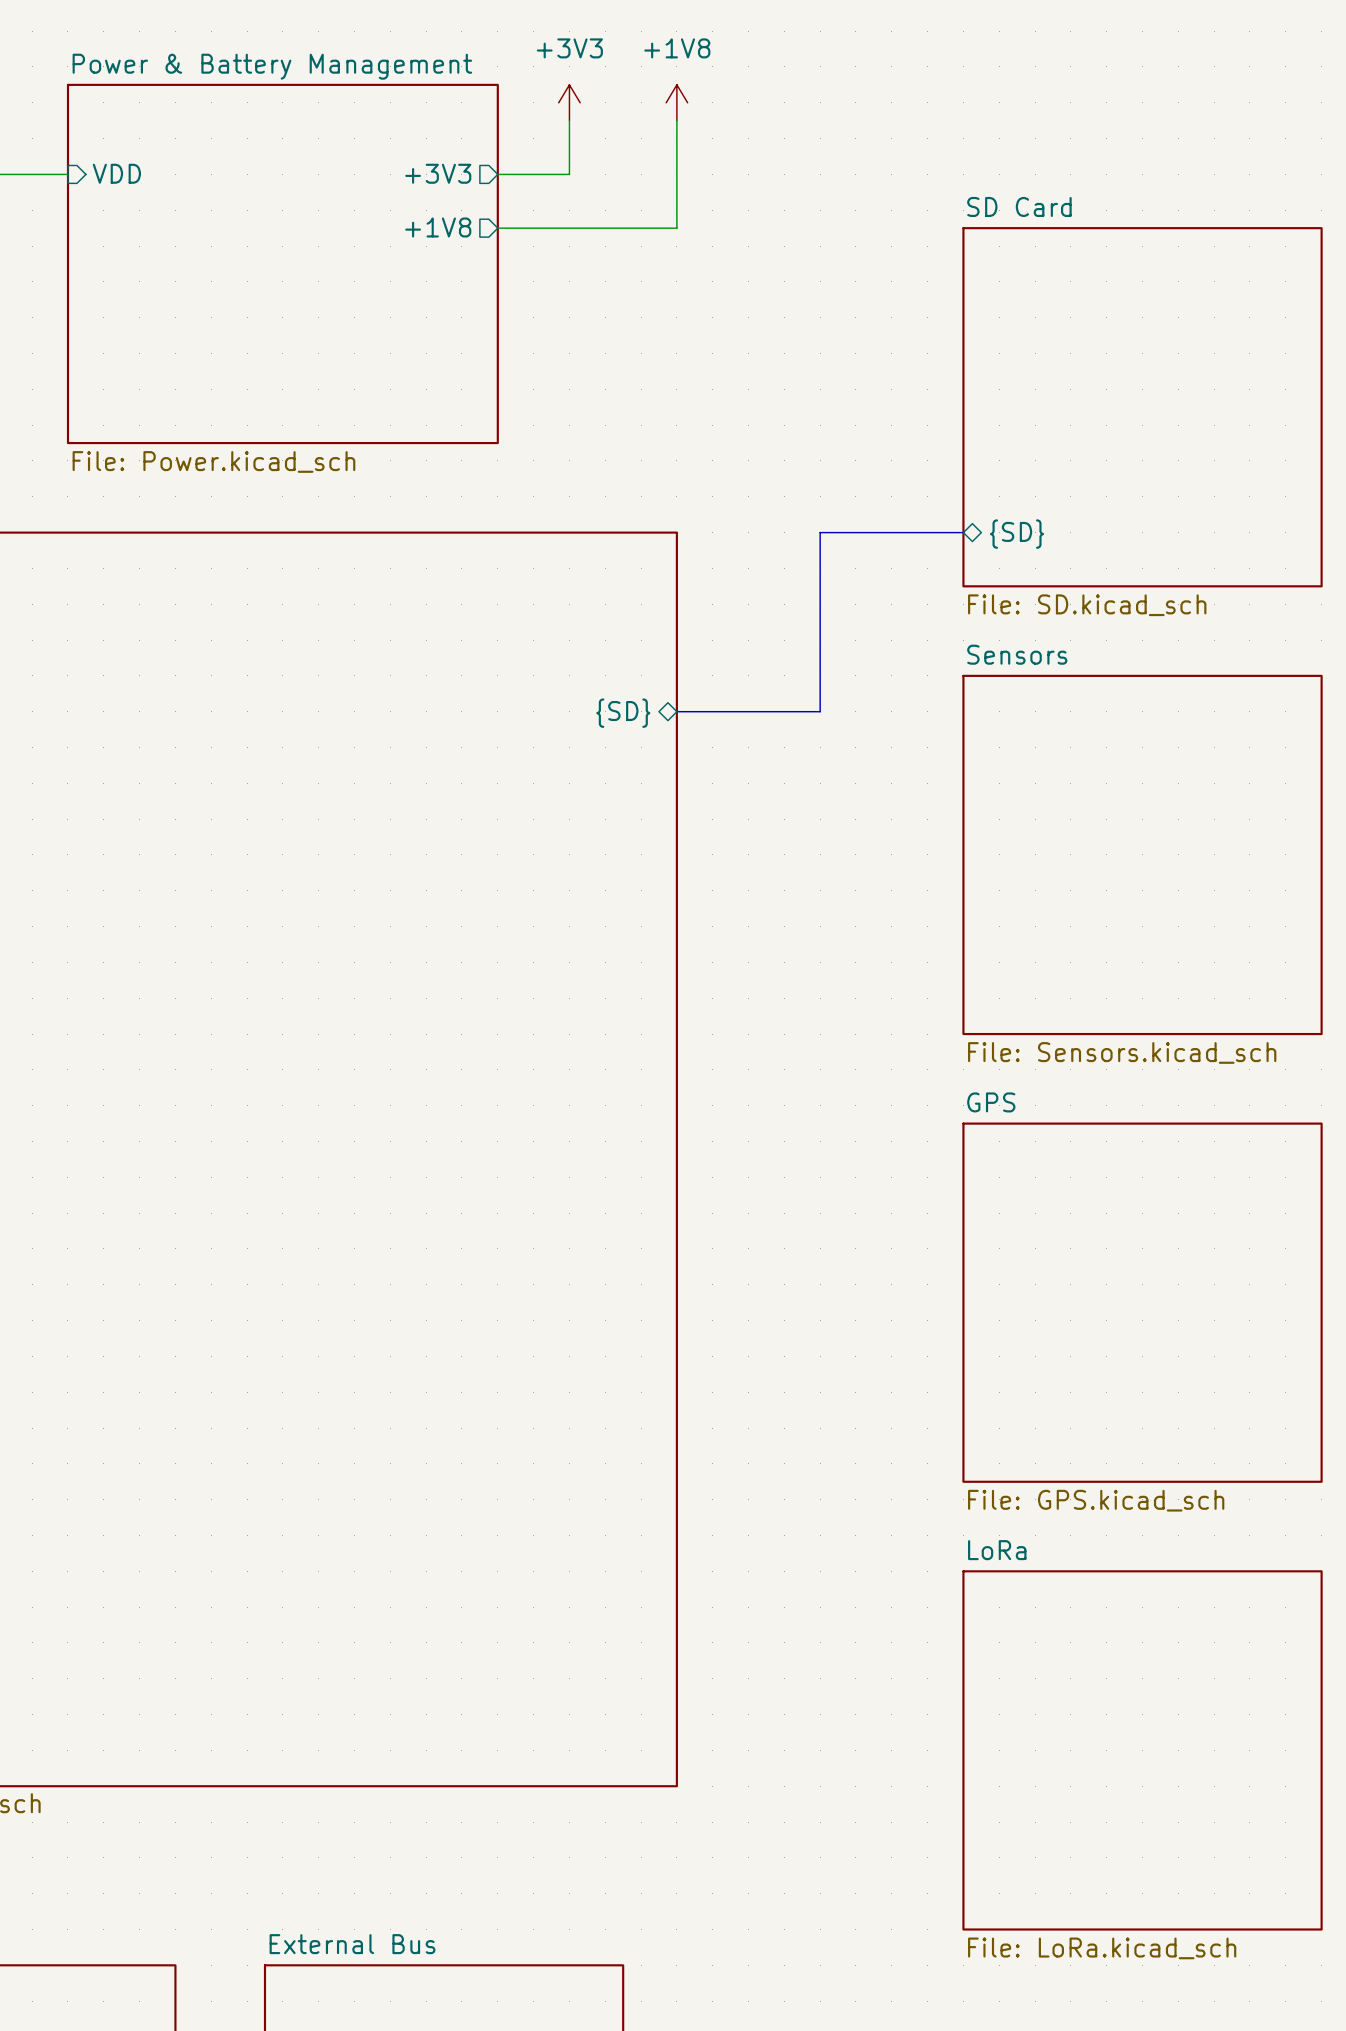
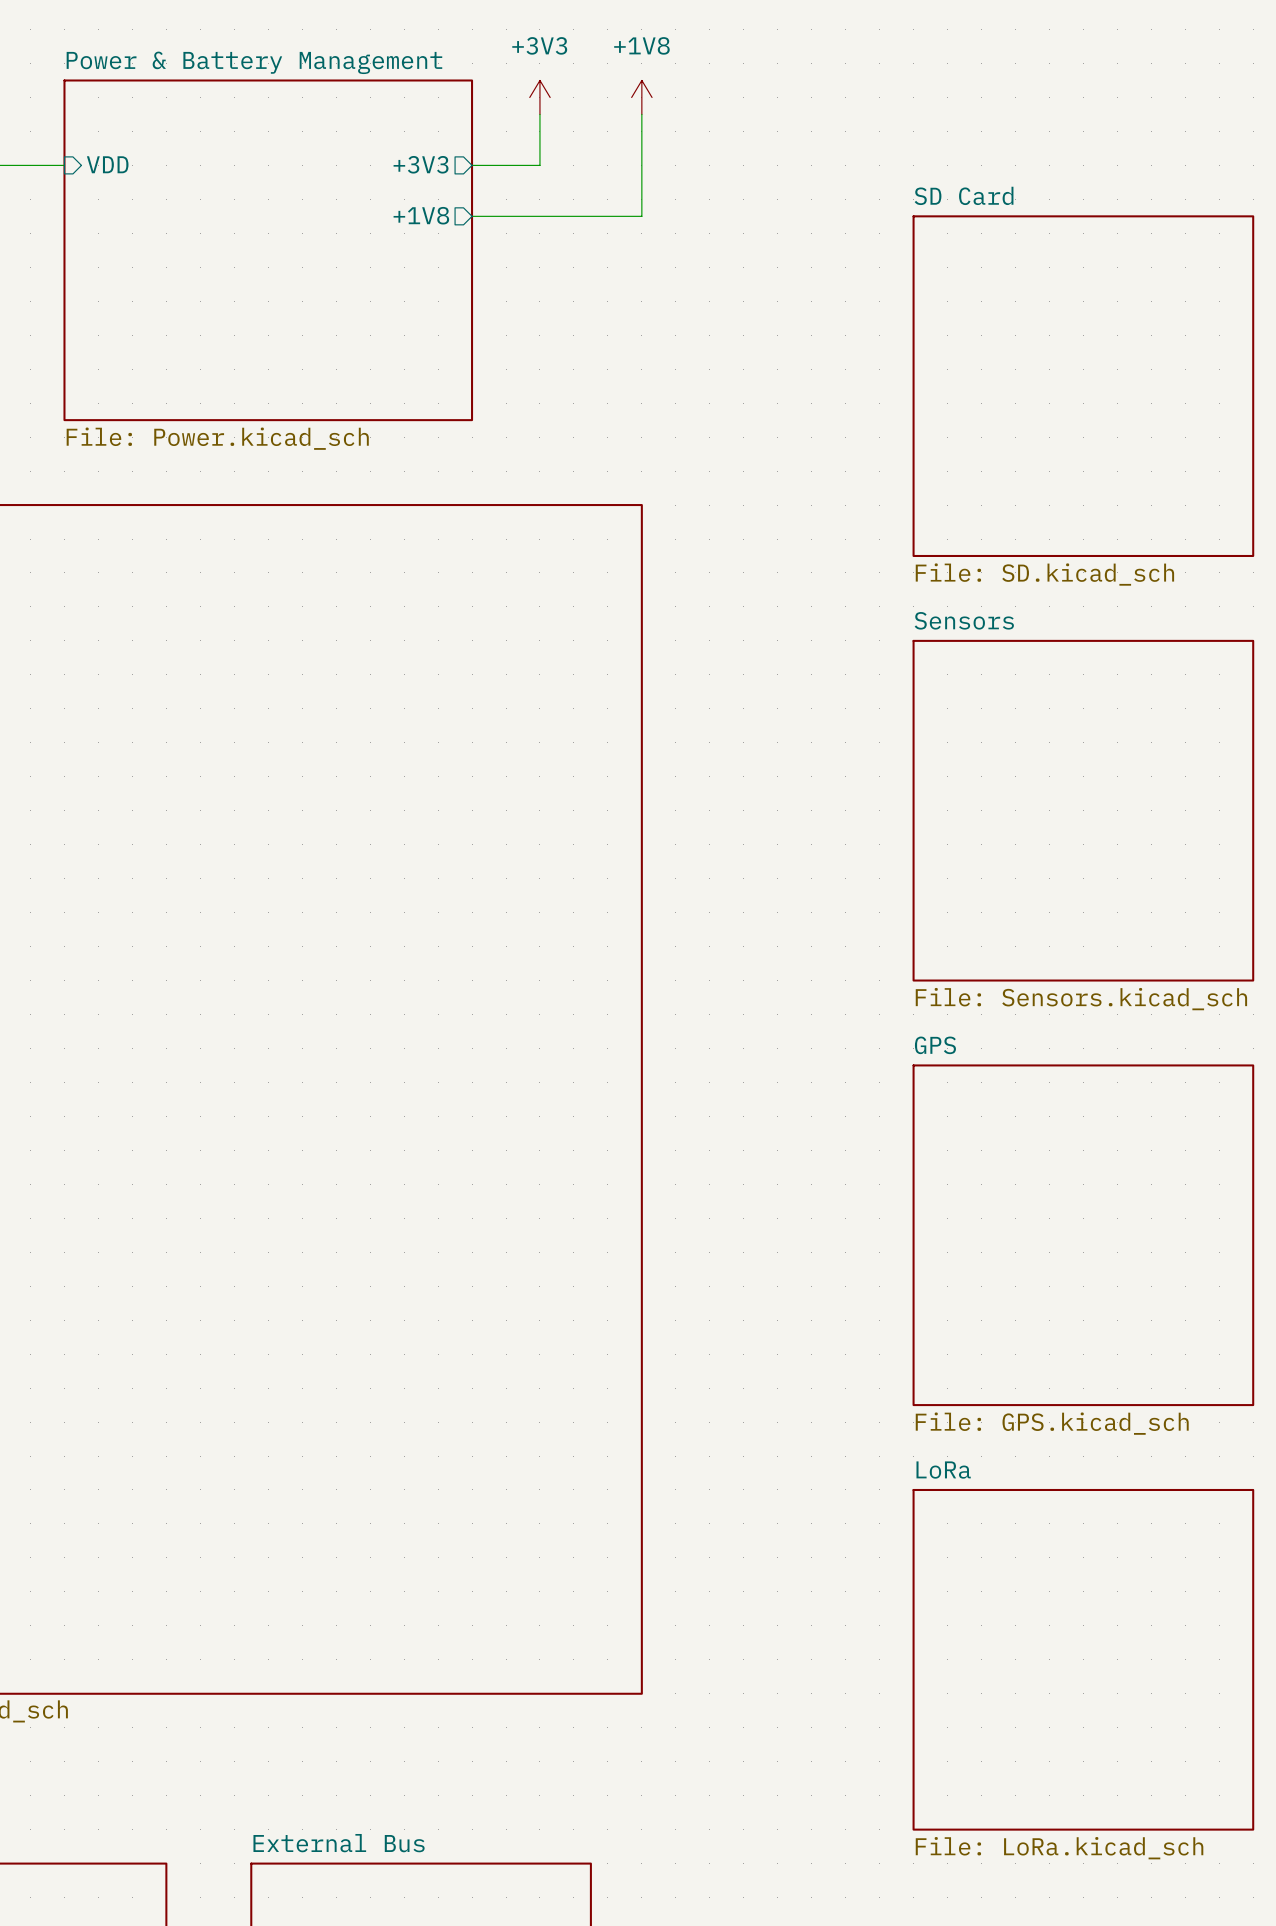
bus: (963, 532) (820, 532) (820, 711) (676, 711) -> none
sheet pin: {SD} (1017, 534) -> none
sheet pin: {SD} (623, 713) -> none

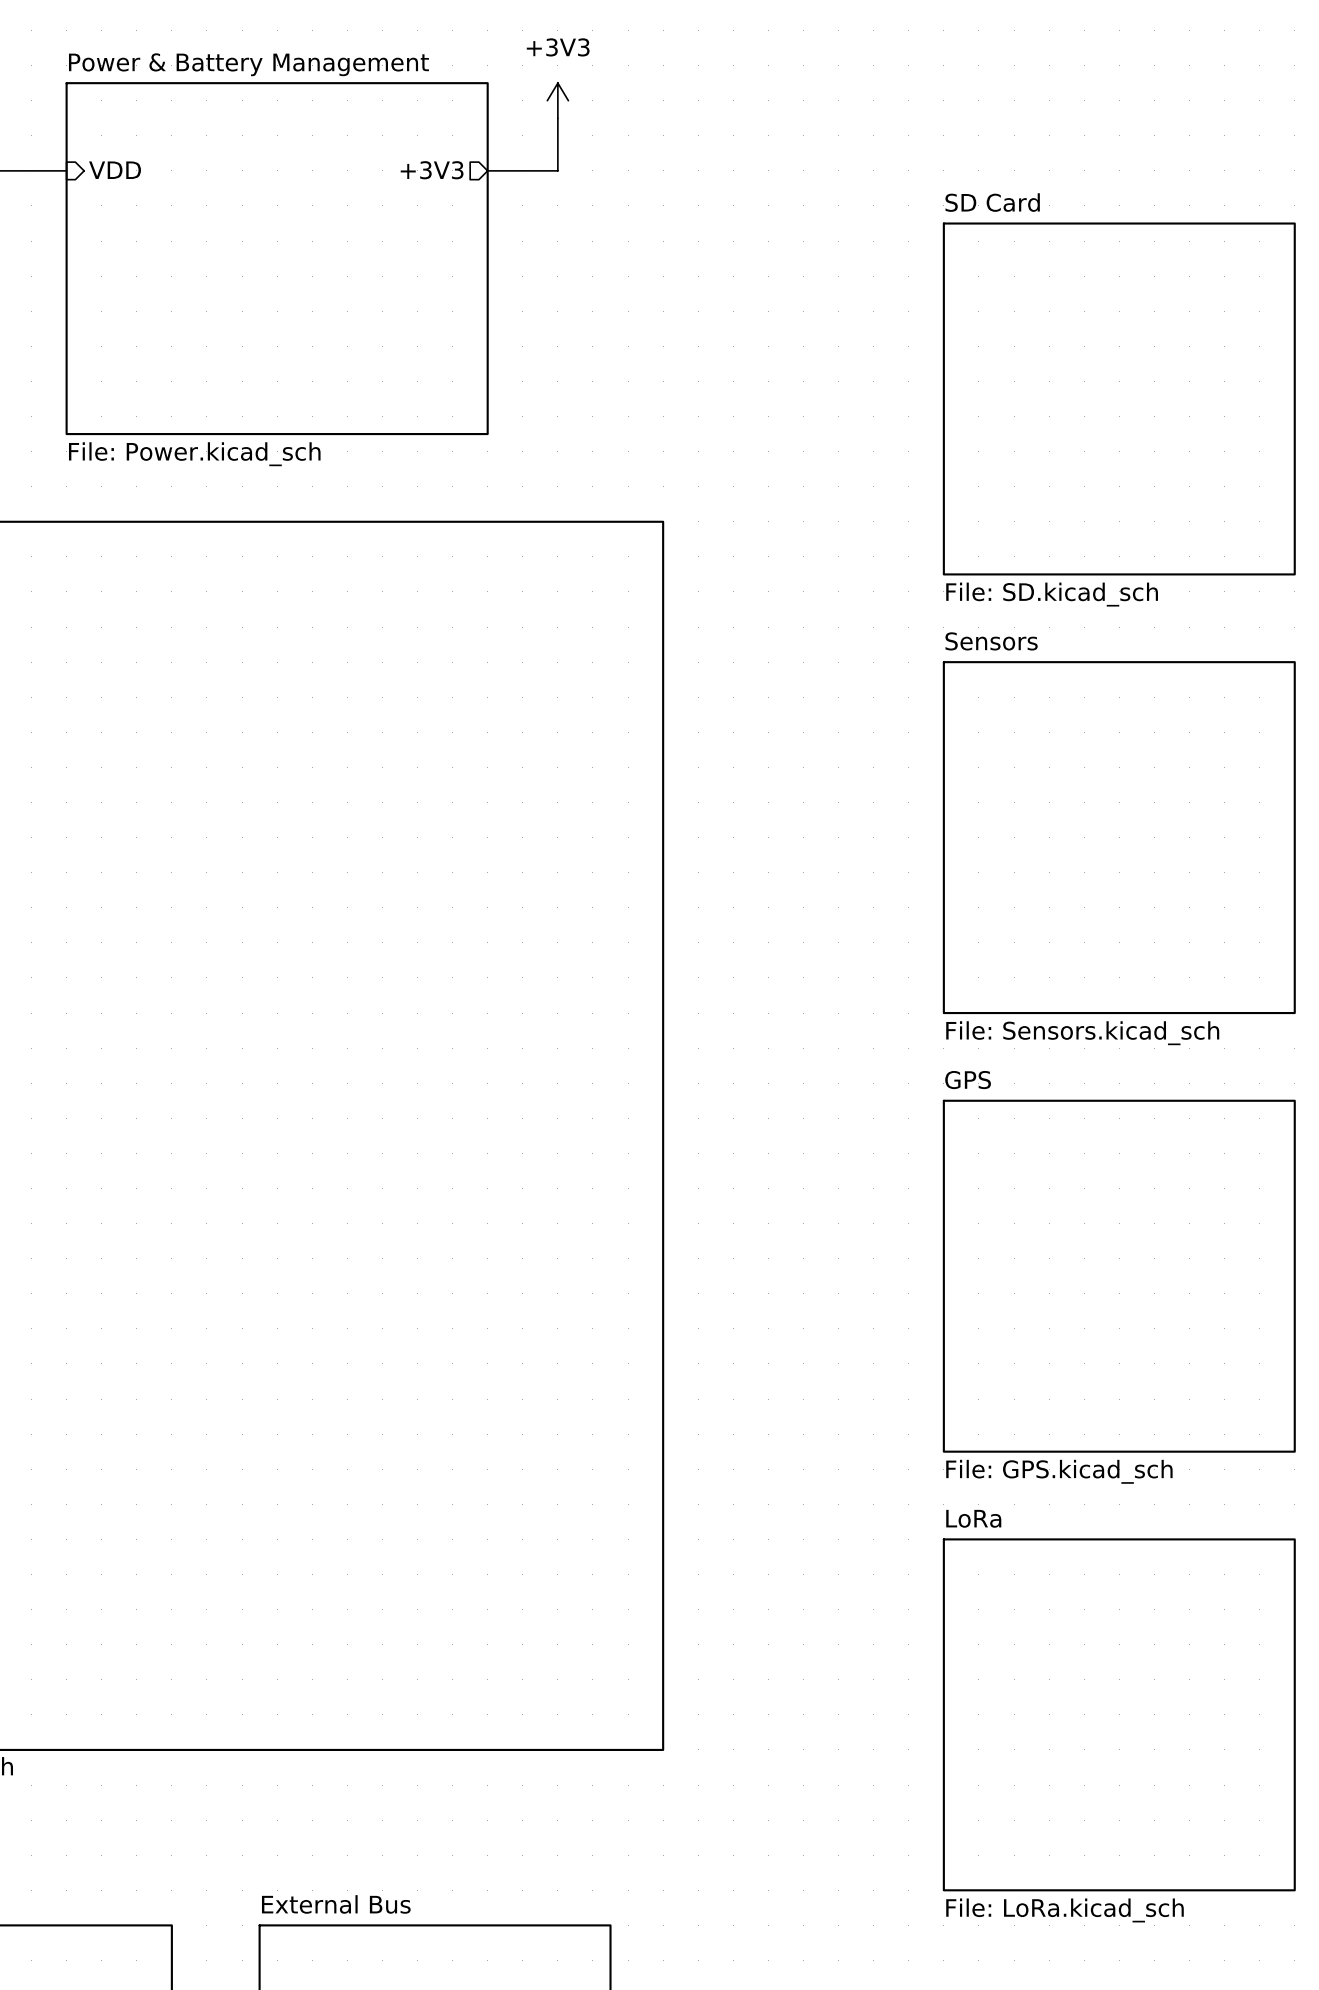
power symbol: +1V8 (641, 97) -> none
wire: (641, 114) (641, 216) (472, 216) -> none
sheet pin: +1V8 (421, 215) -> none

